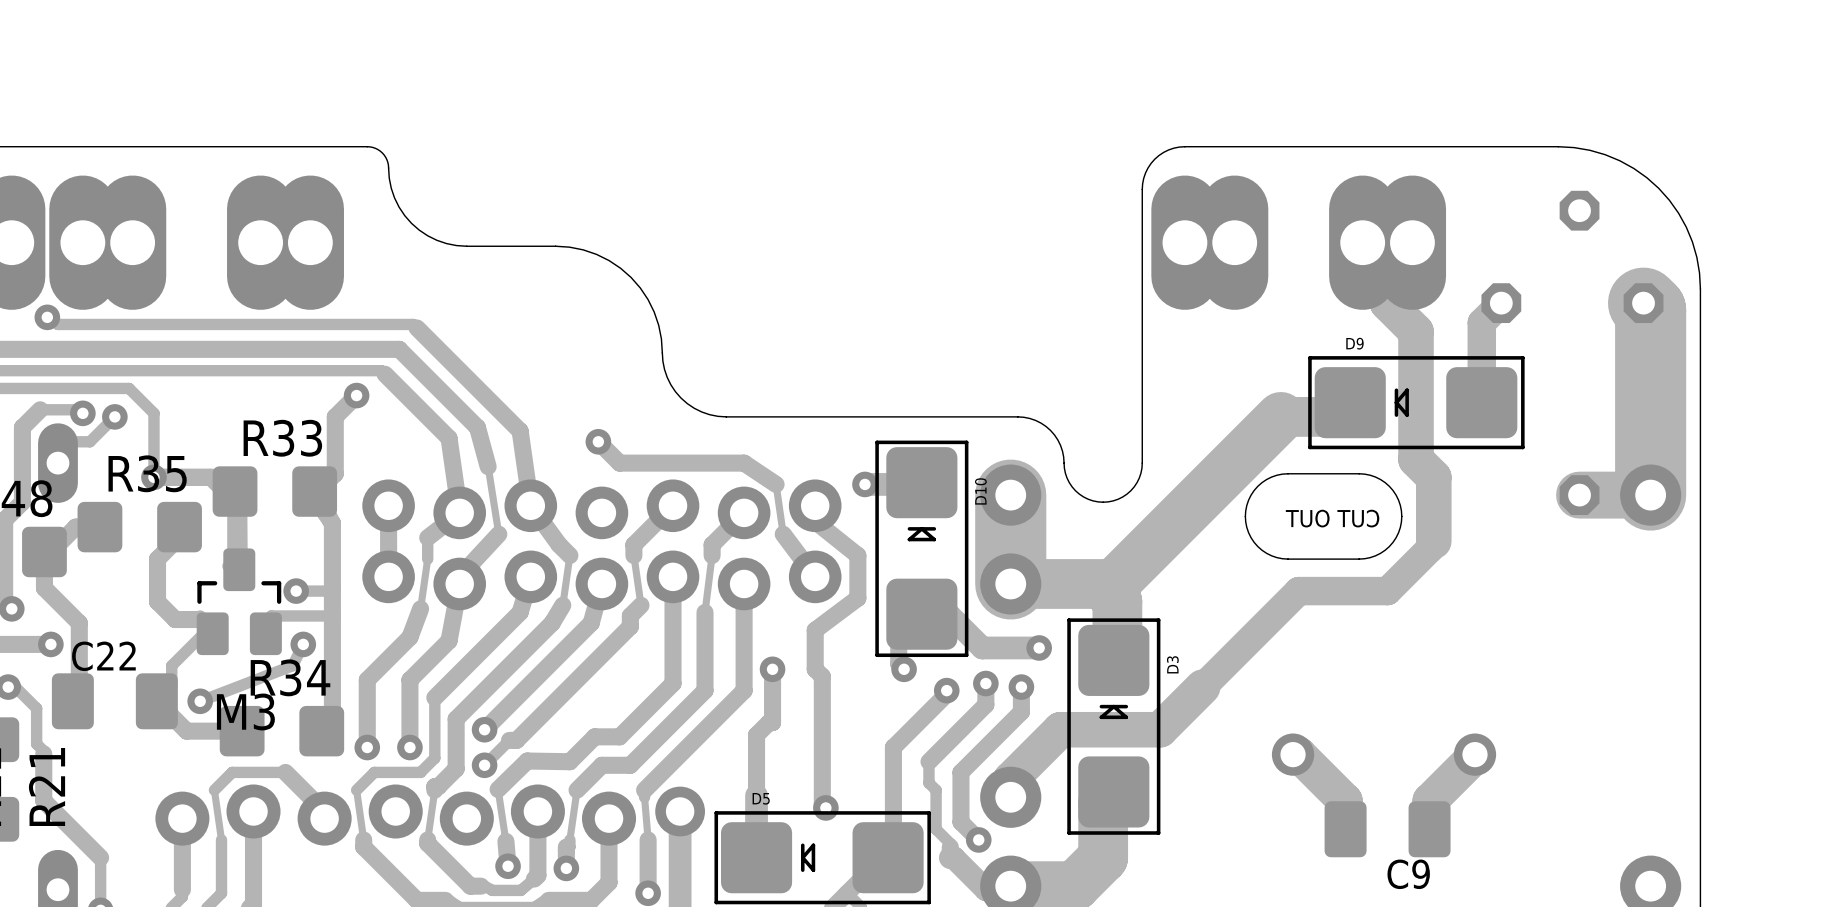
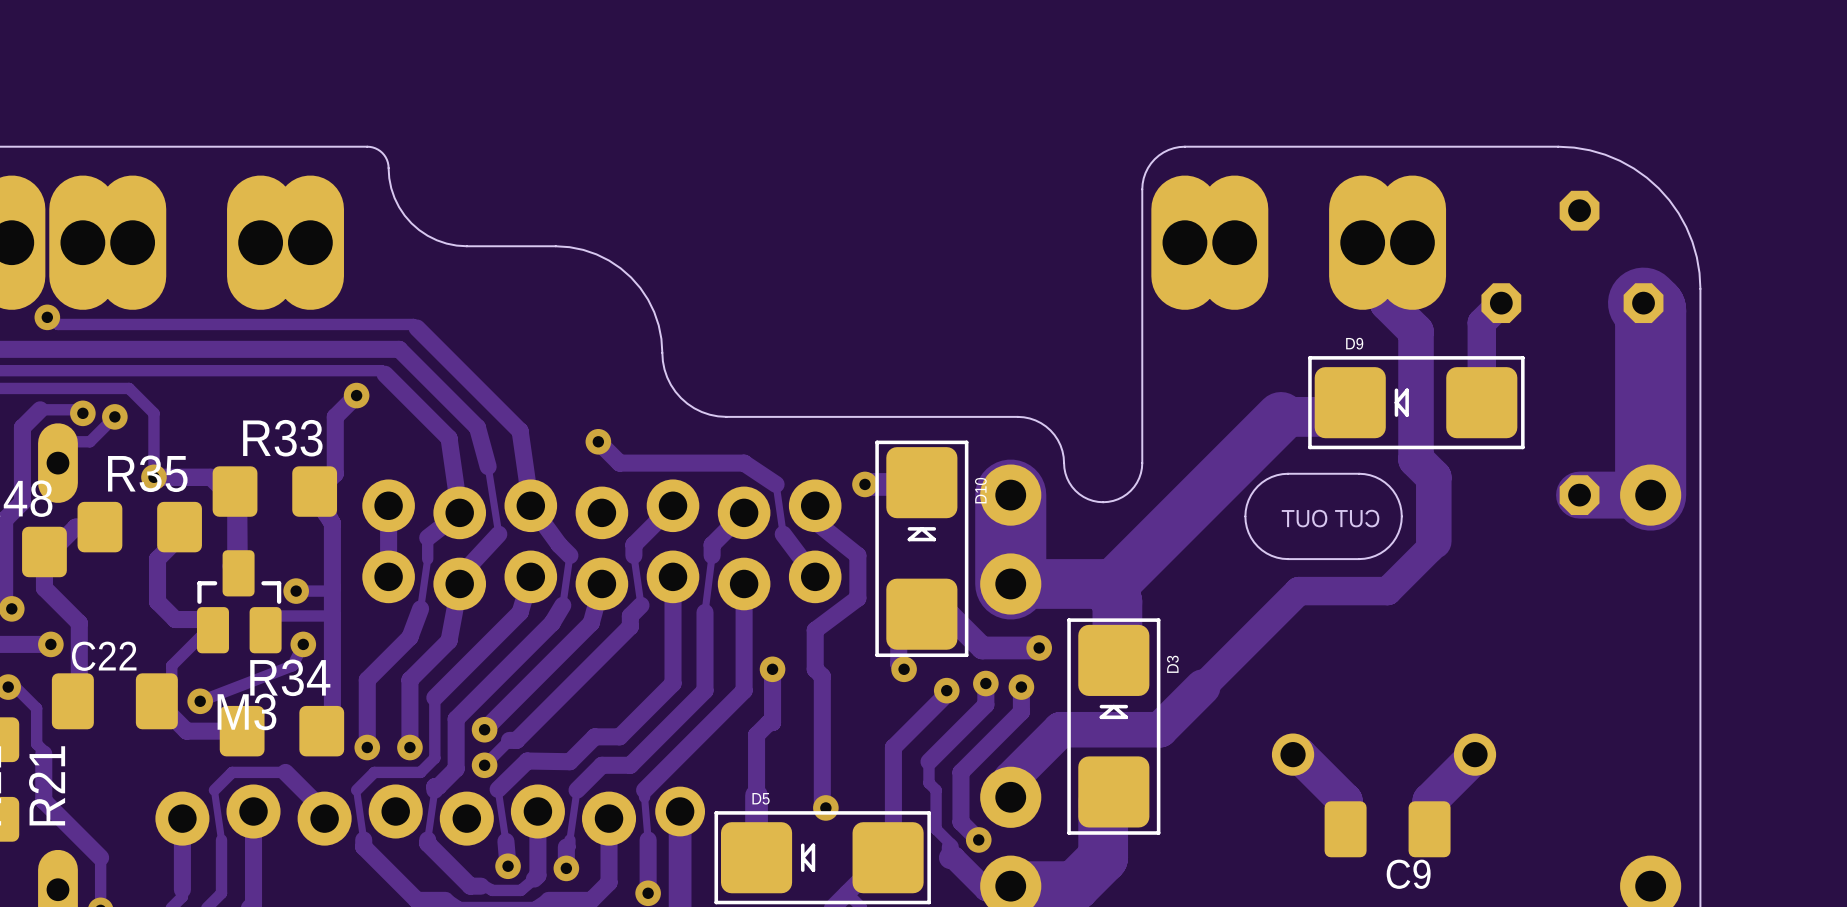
M3 footprint: [196, 548, 282, 656] -> [196, 550, 282, 654]

